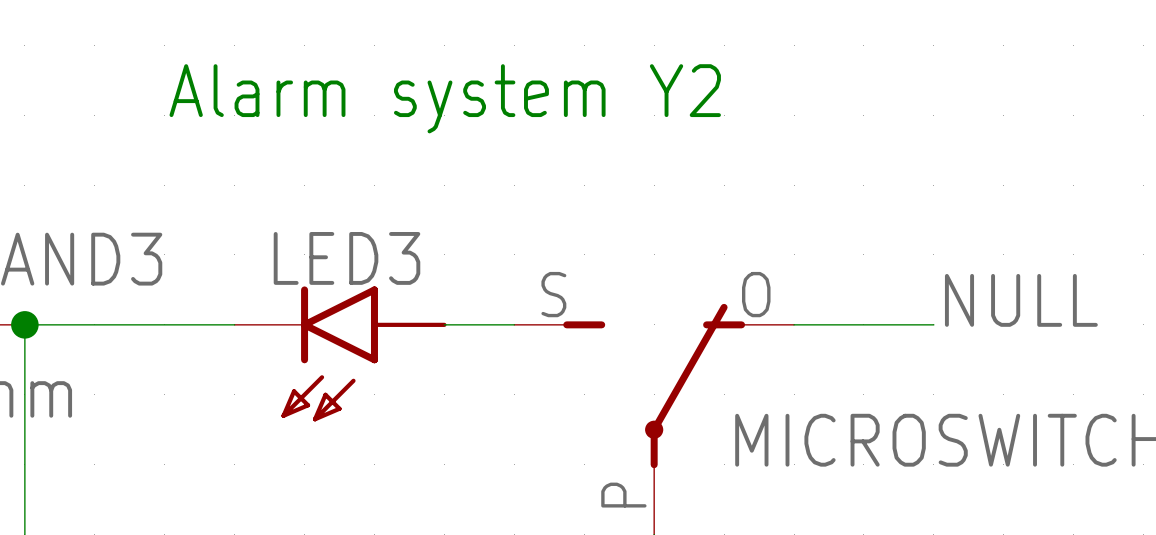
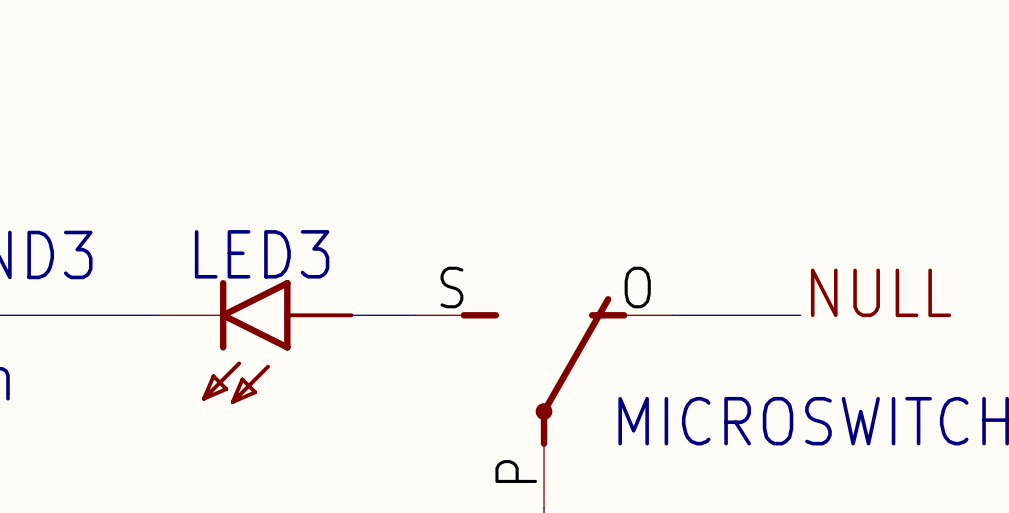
text: Alarm system Y2 (445, 98) -> none

